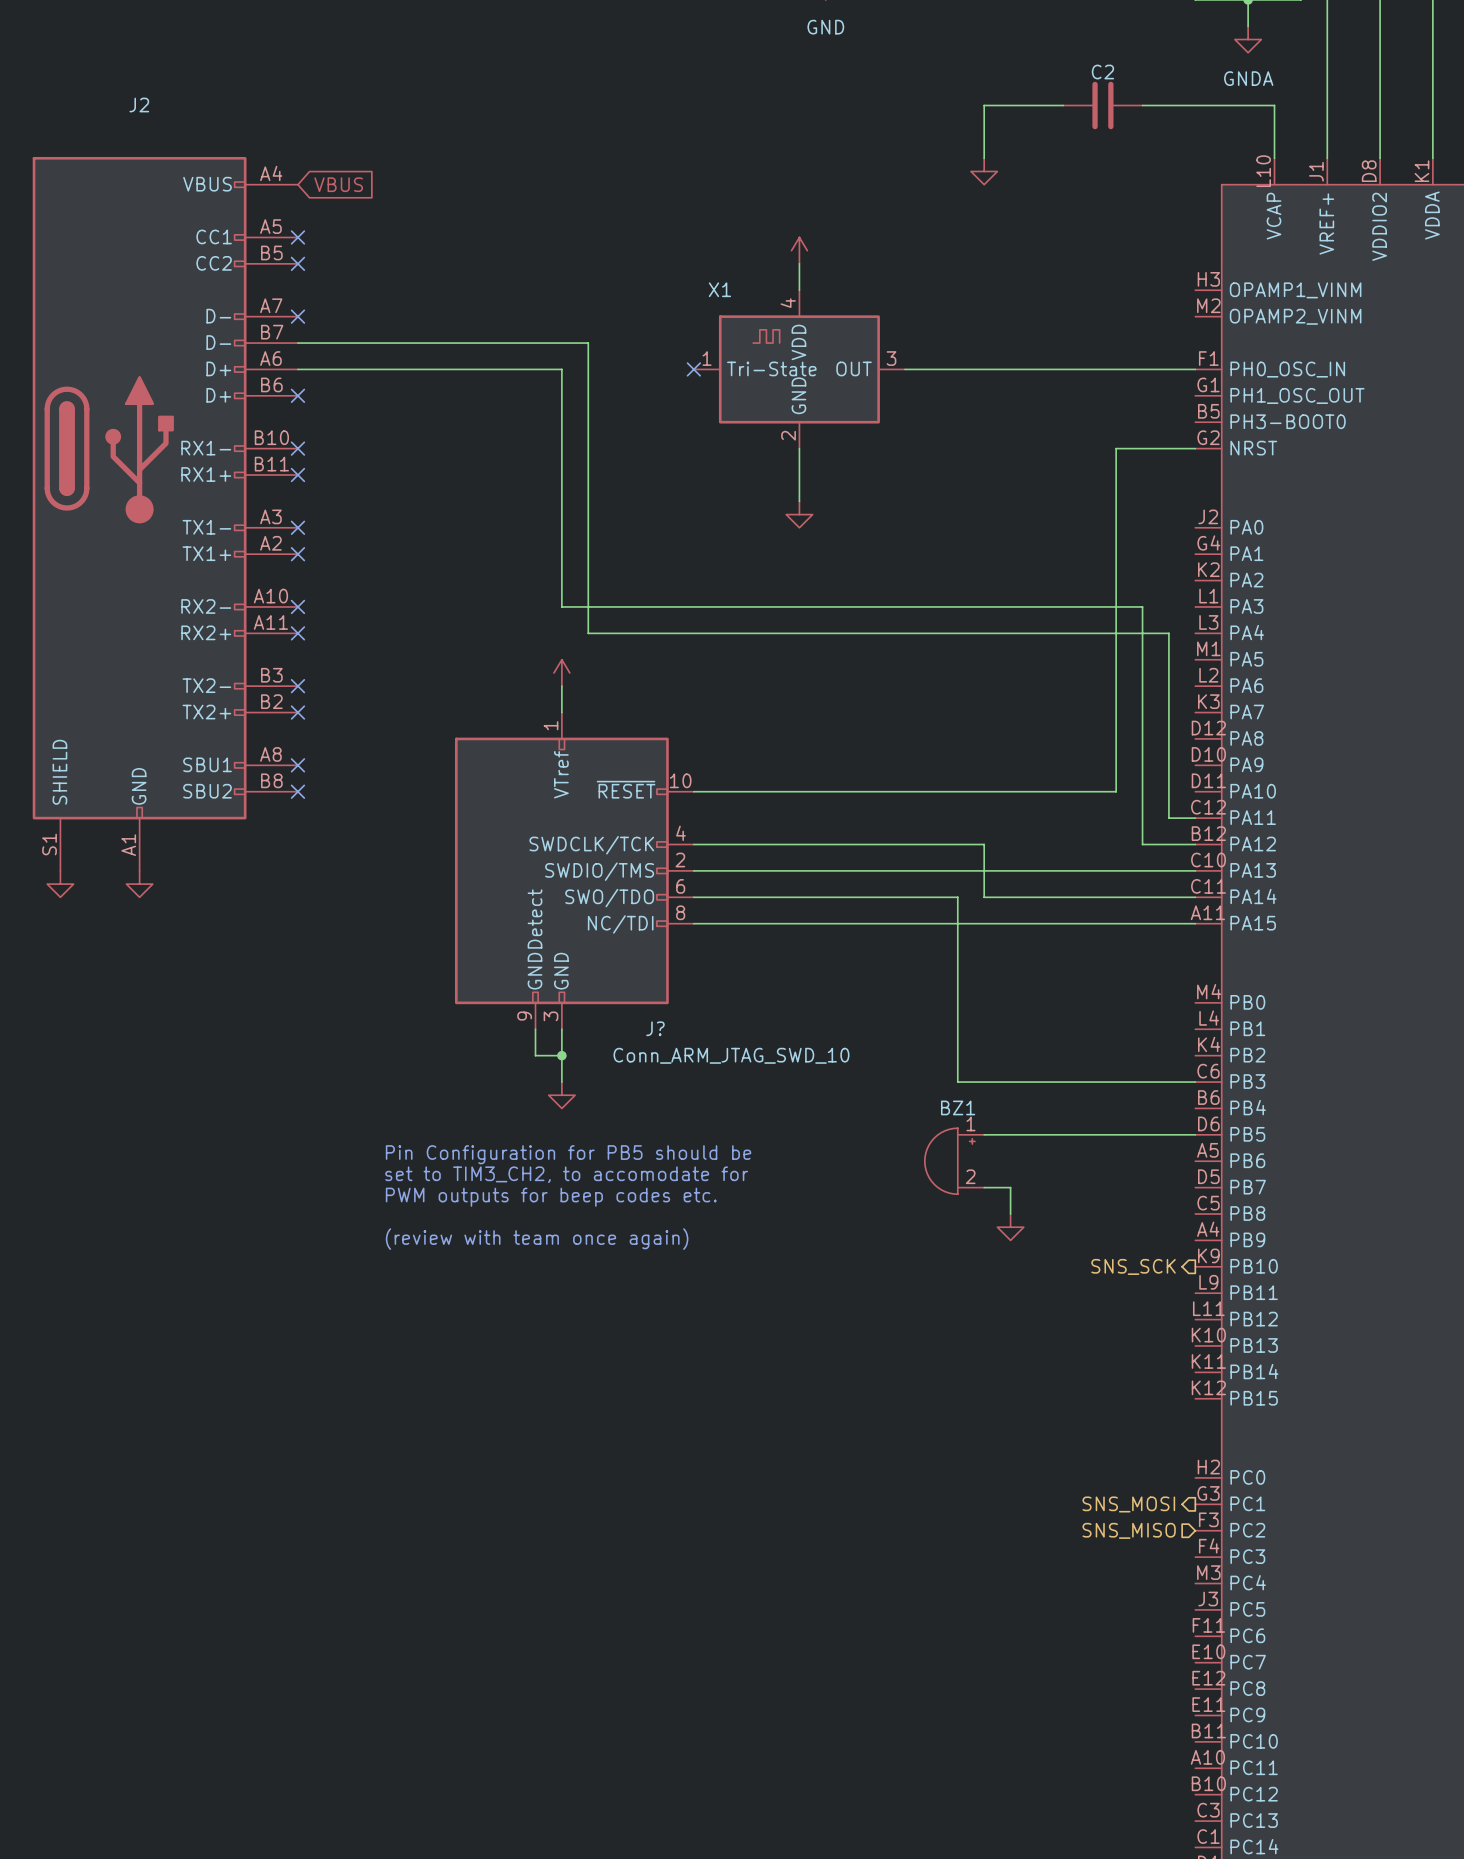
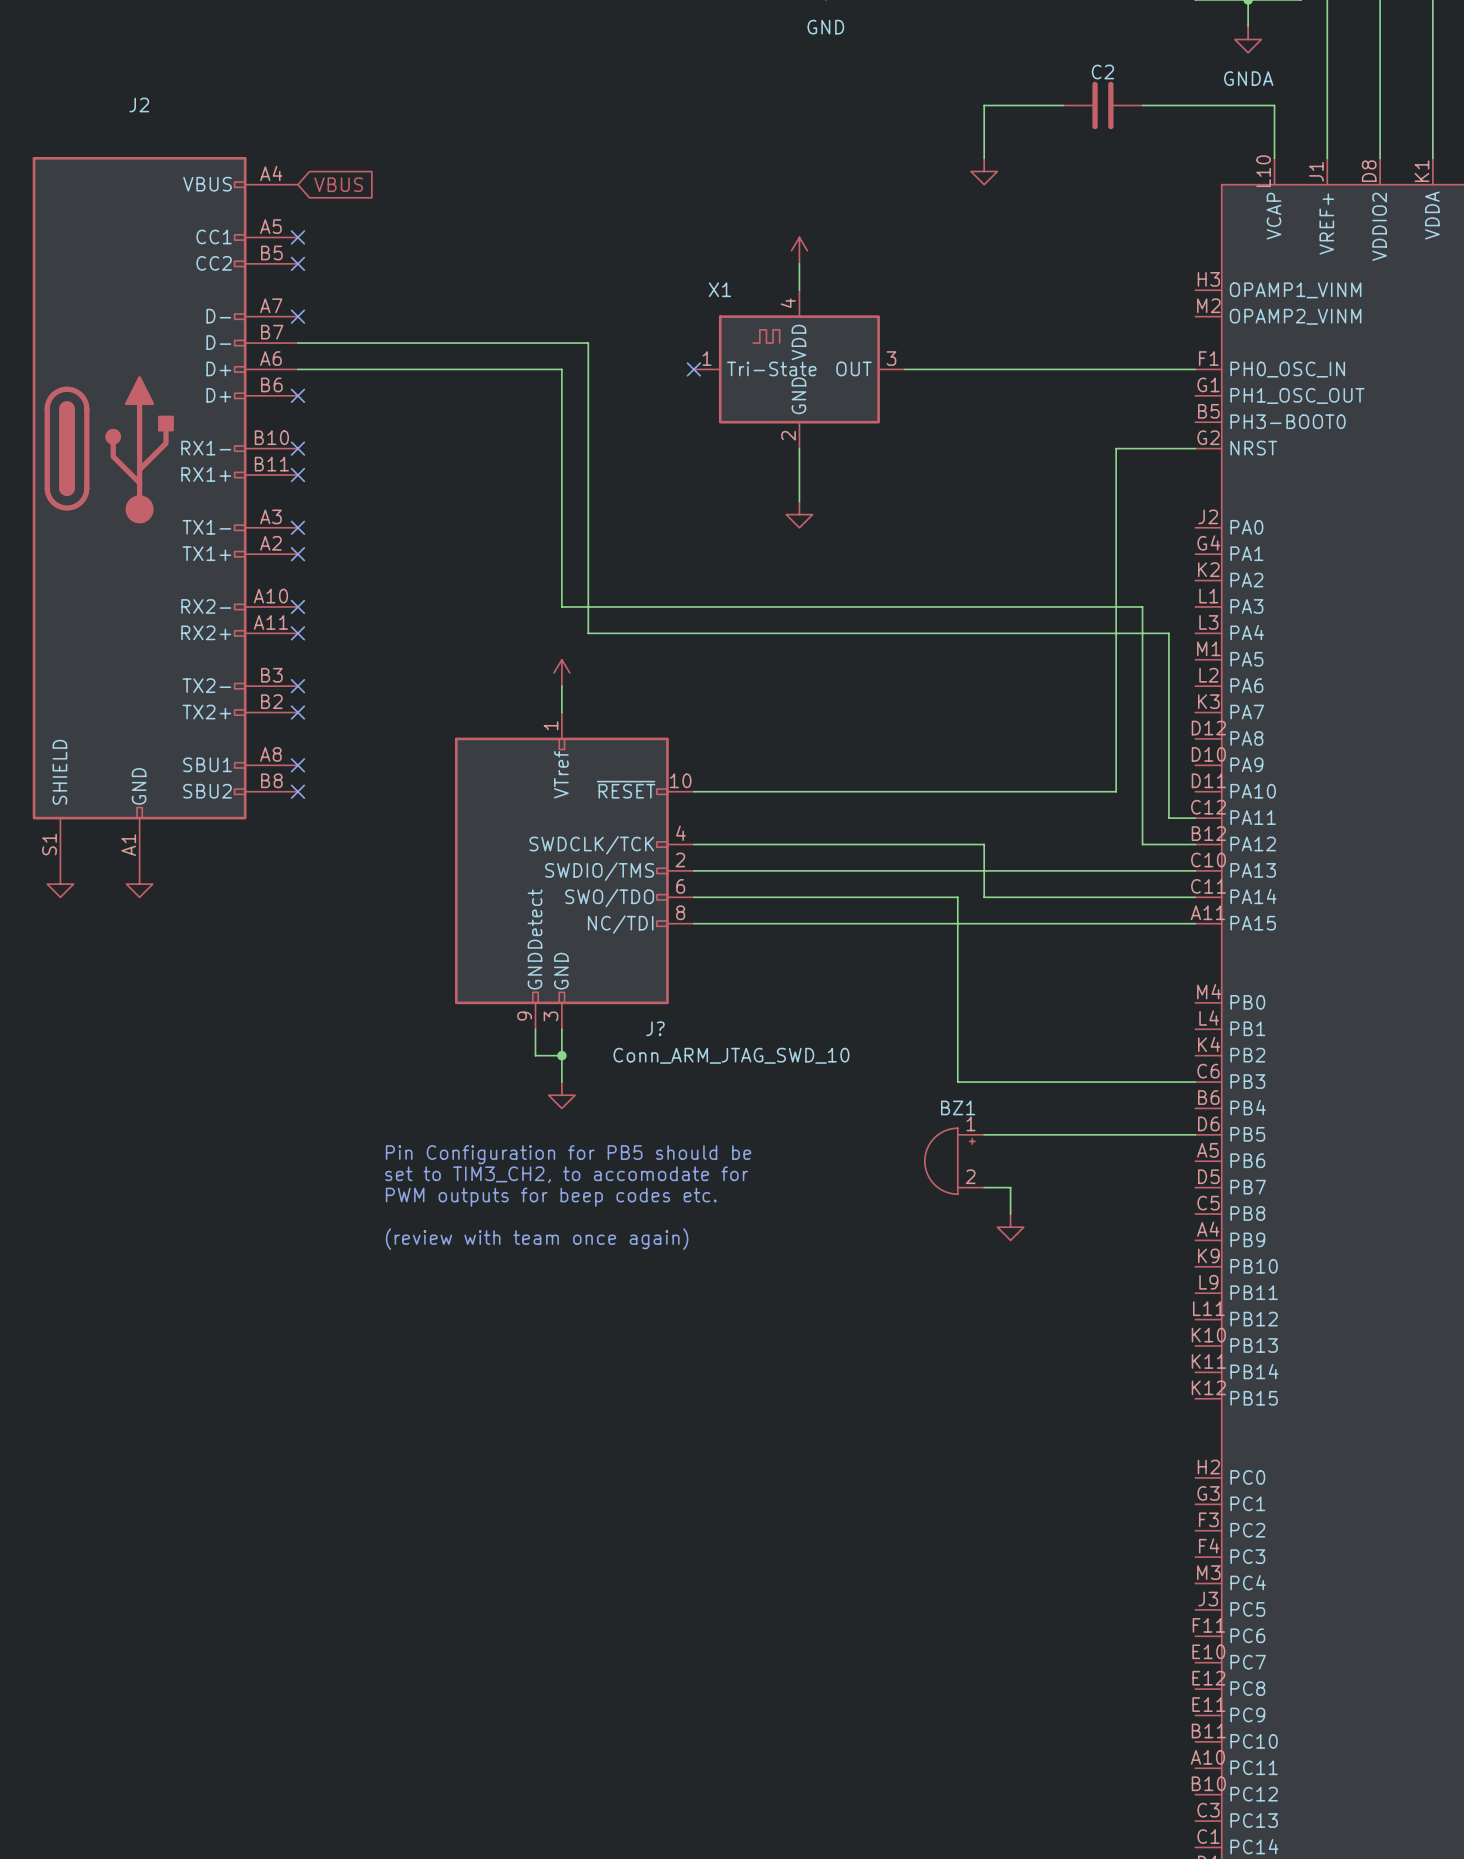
hierarchical label: SNS_SCK (1133, 1266) -> none
hierarchical label: SNS_MOSI (1128, 1504) -> none
hierarchical label: SNS_MISO (1129, 1530) -> none

